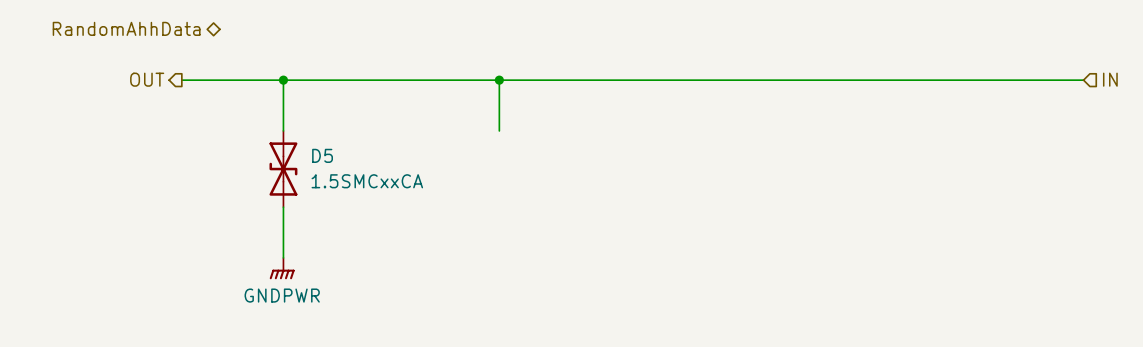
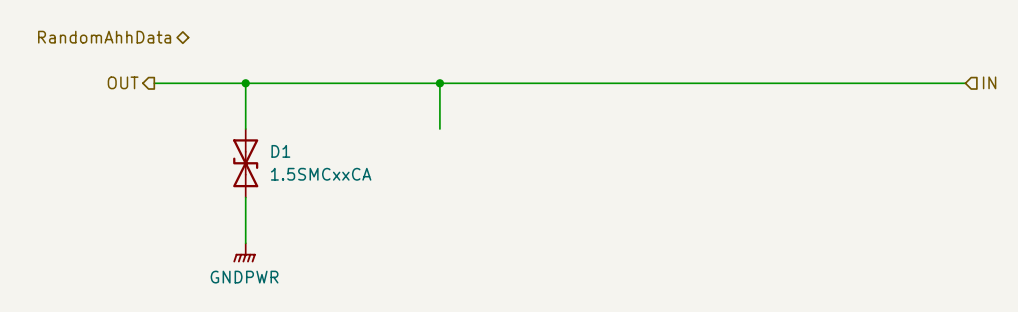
D5 name: D5 (322, 155) -> D1 (280, 151)

